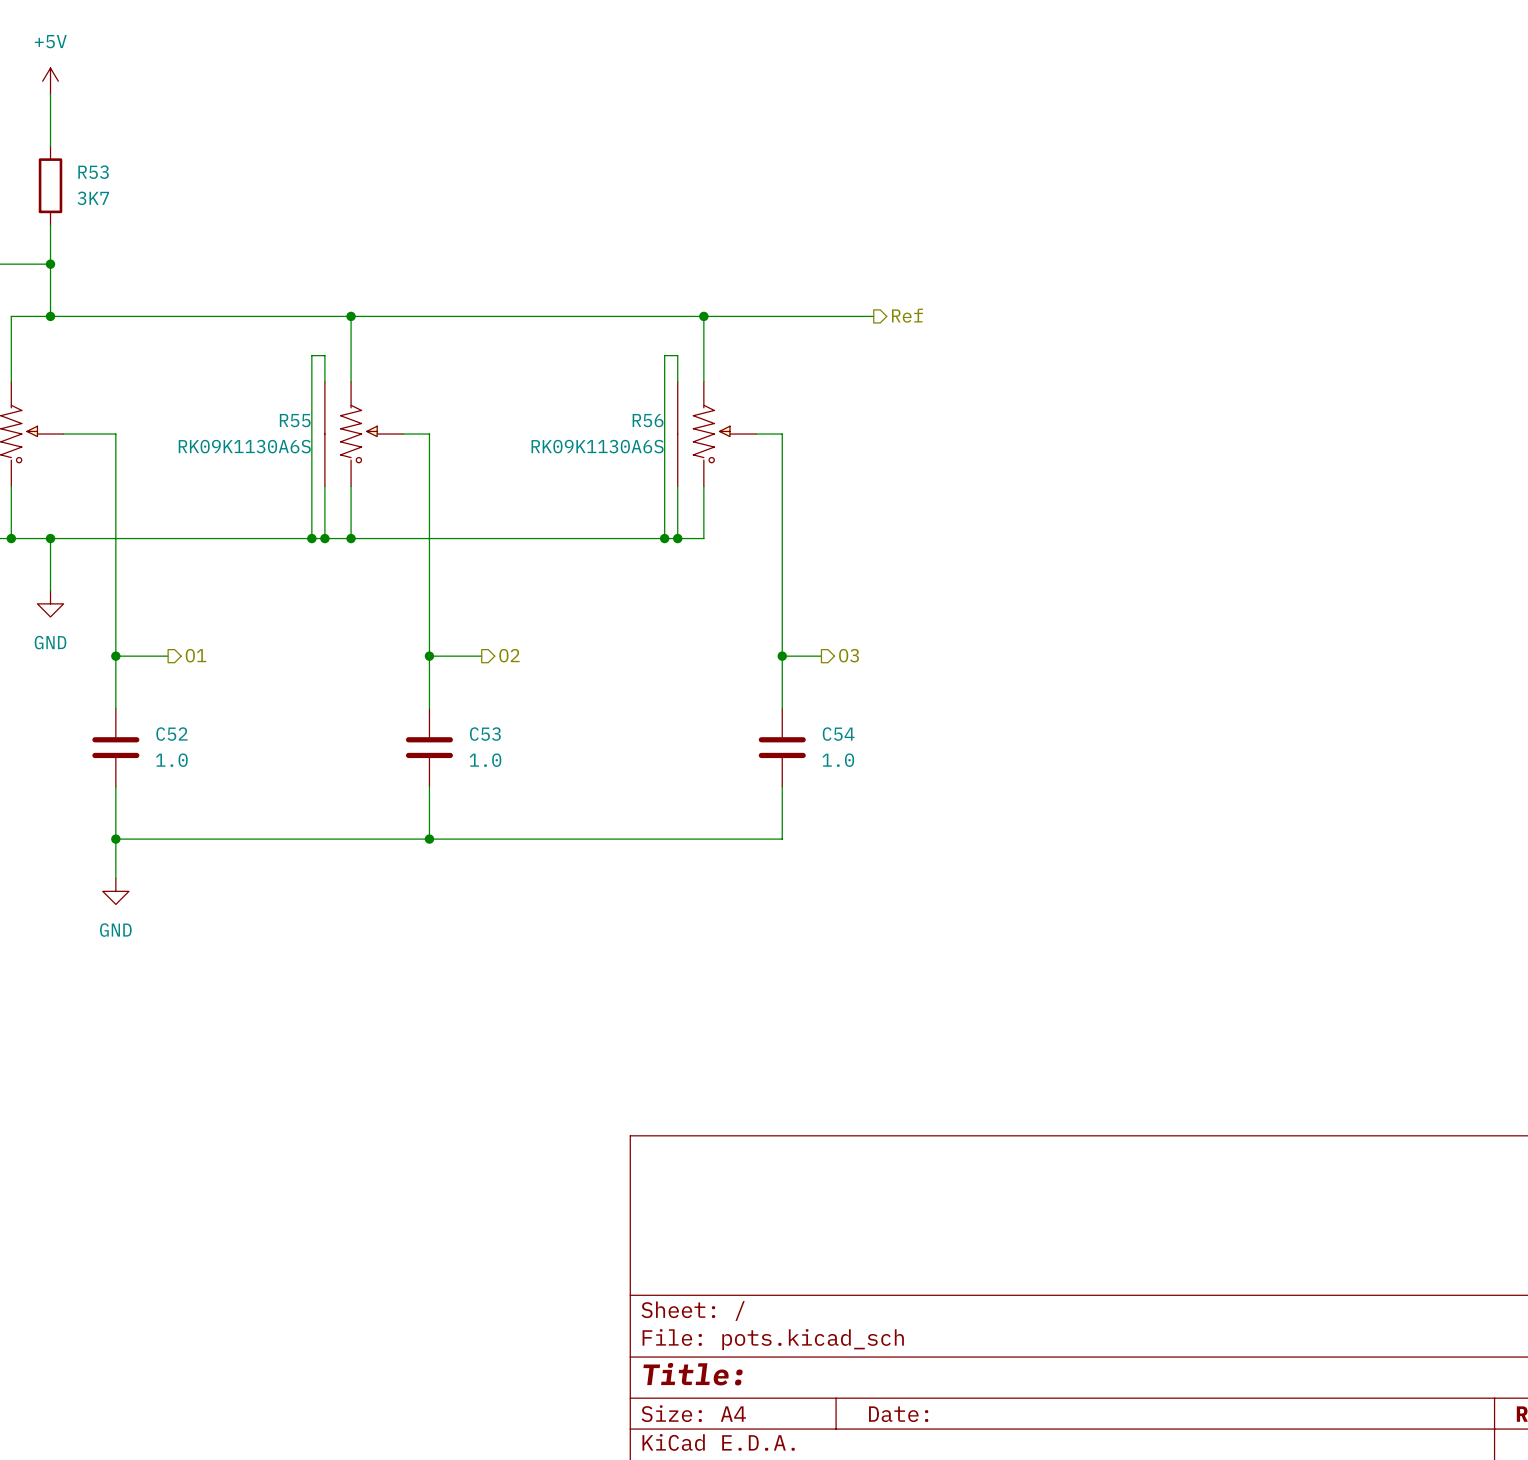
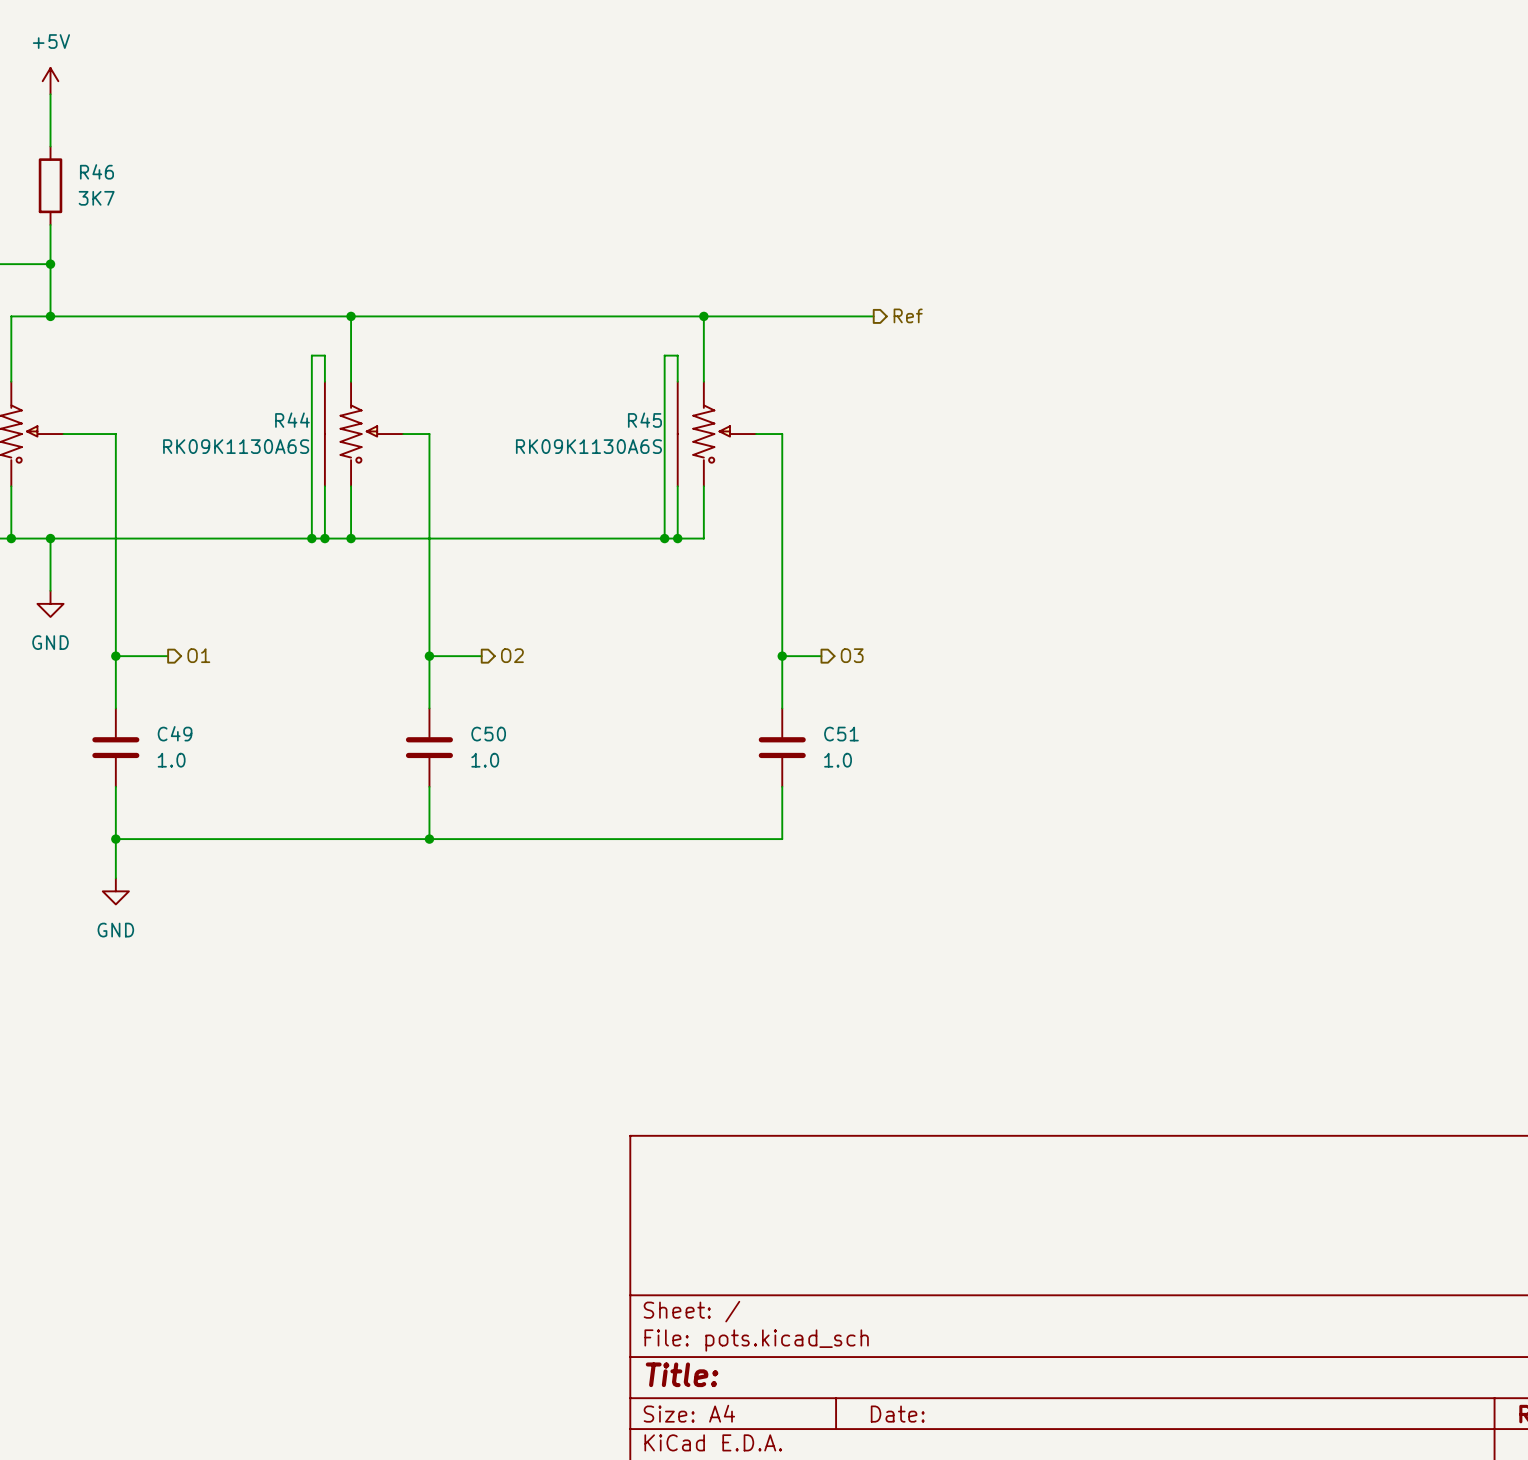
R53 name: R53 (93, 172) -> R46 (96, 171)
R55 name: R55 (295, 420) -> R44 (292, 420)
R56 name: R56 (648, 420) -> R45 (644, 420)
C52 name: C52 (171, 734) -> C49 (175, 733)
C53 name: C53 (485, 734) -> C50 (488, 734)
C54 name: C54 (838, 734) -> C51 (841, 734)

